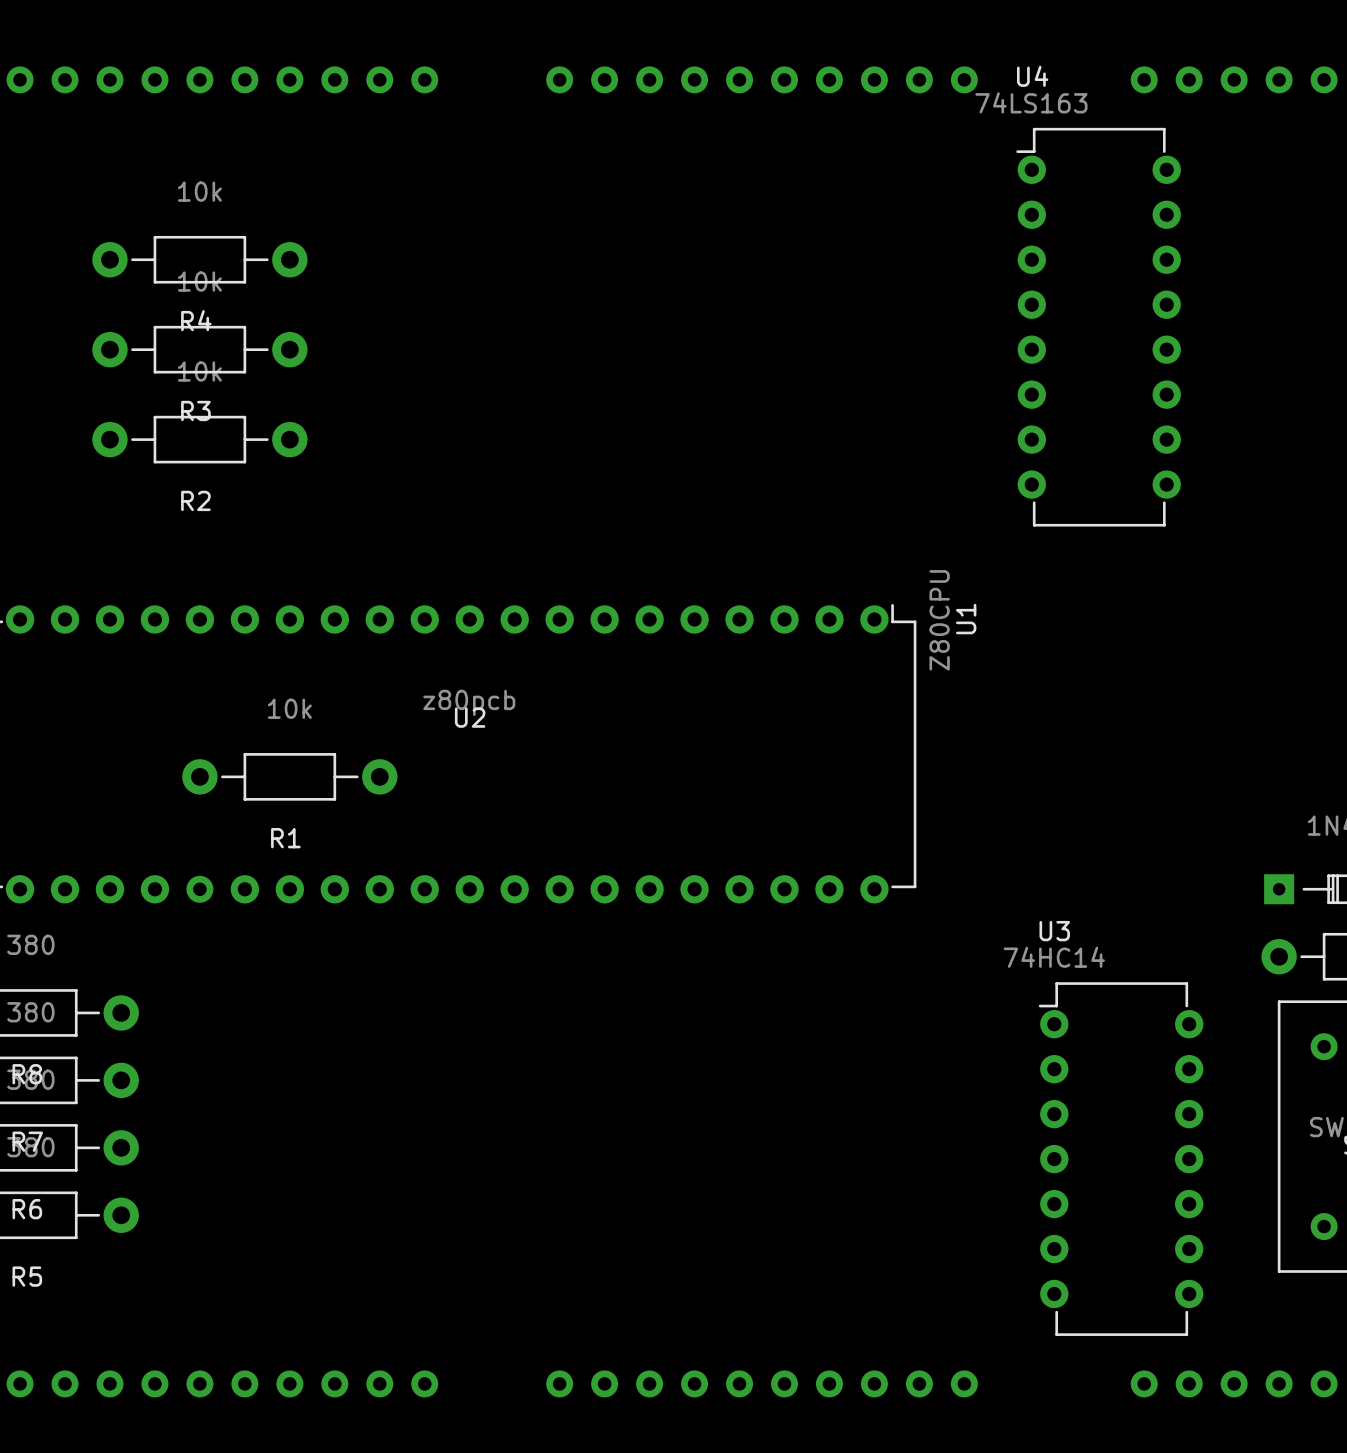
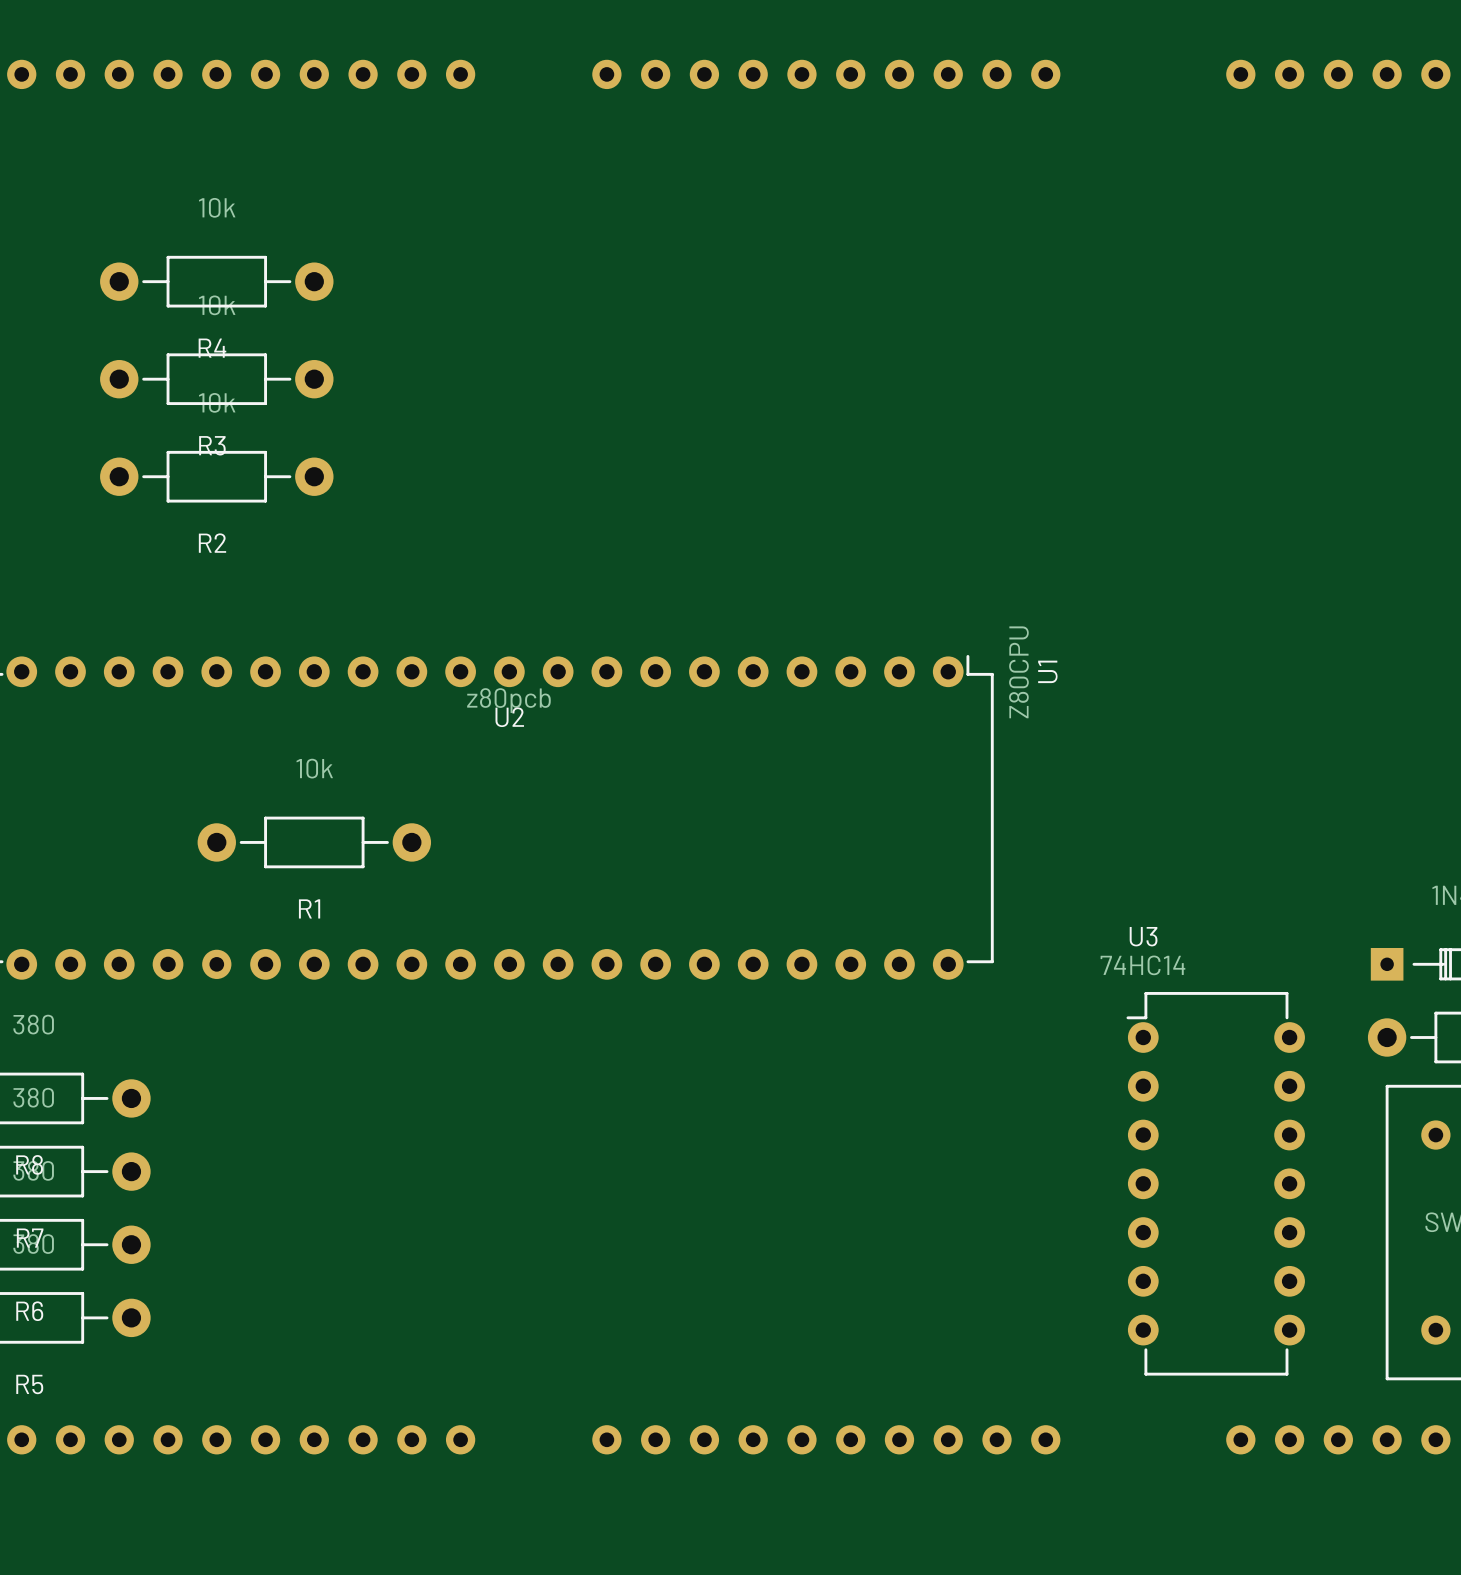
U2 footprint: [6, 66, 1338, 1398] -> [7, 59, 1451, 1455]
U4: 74LS163 (1098, 327) -> none
U3 position: (1121, 1159) -> (1215, 1183)

